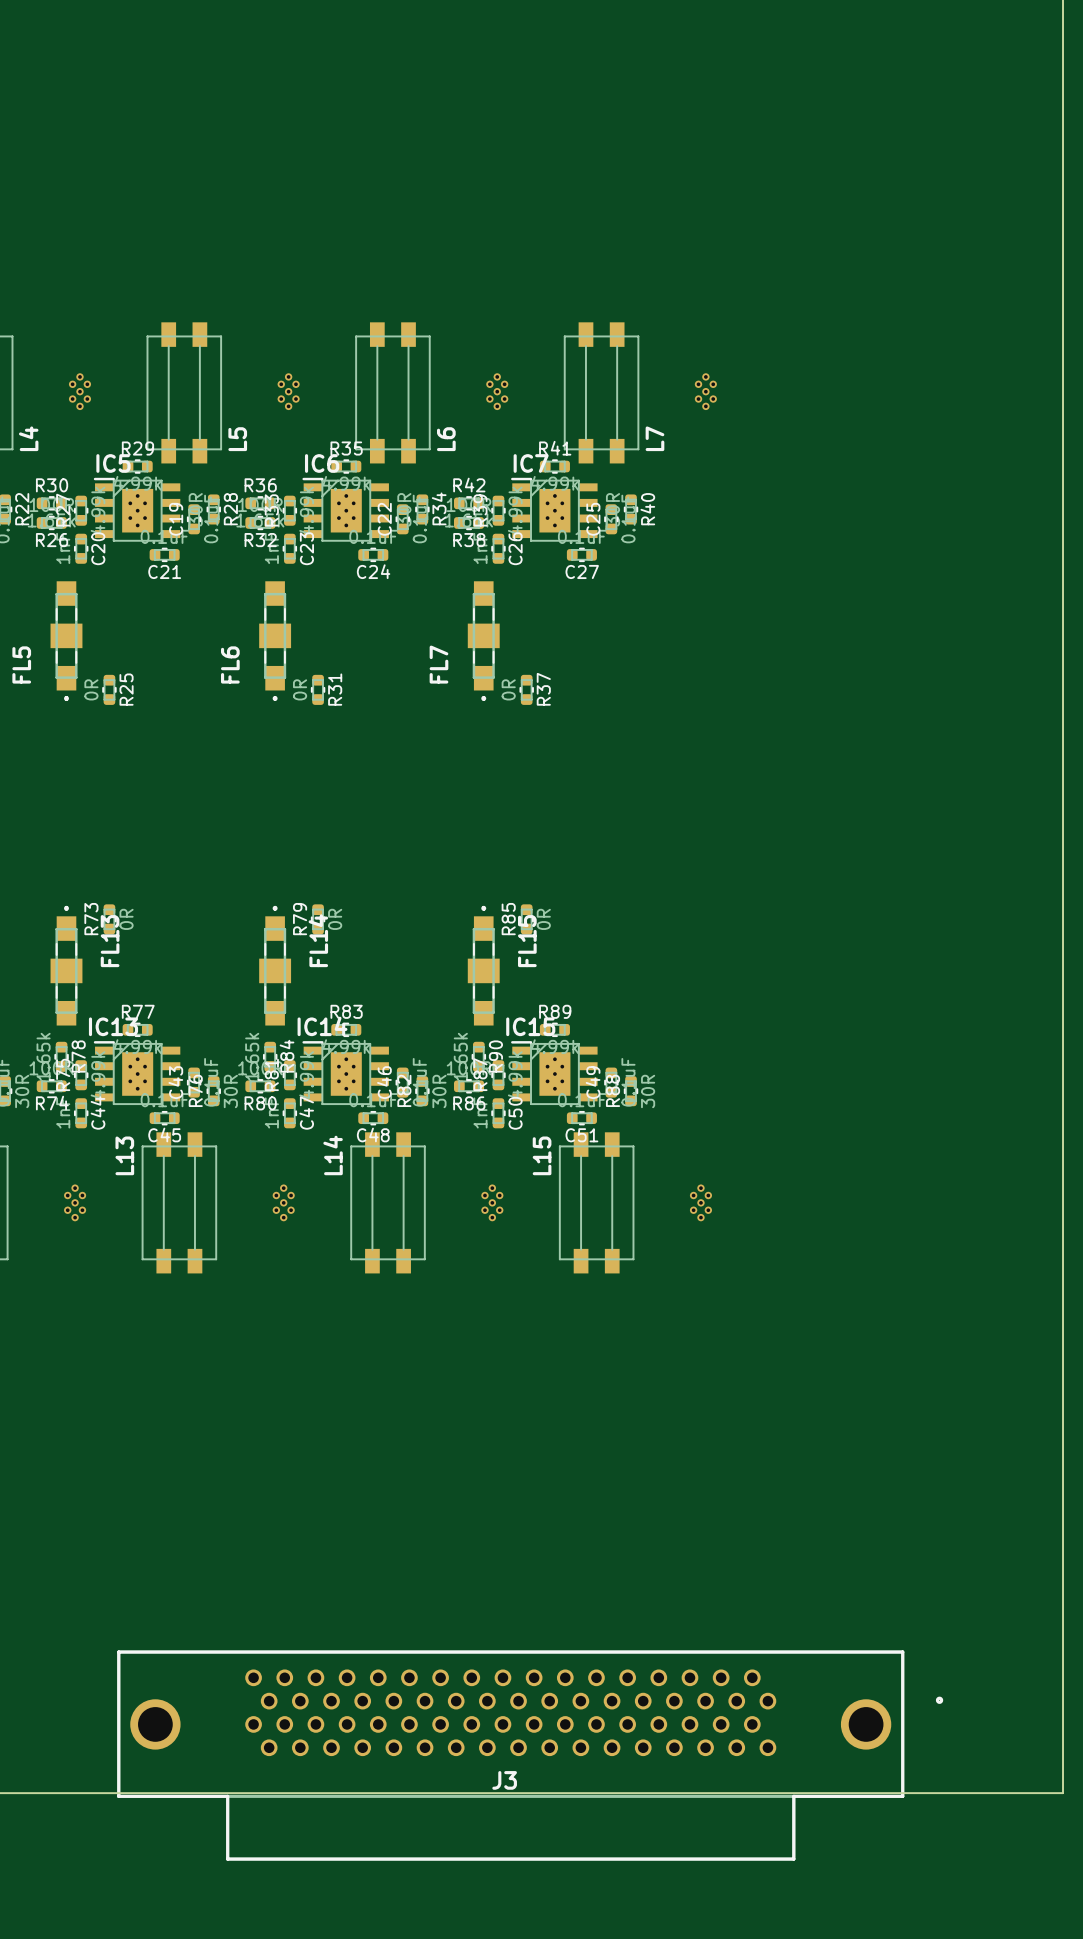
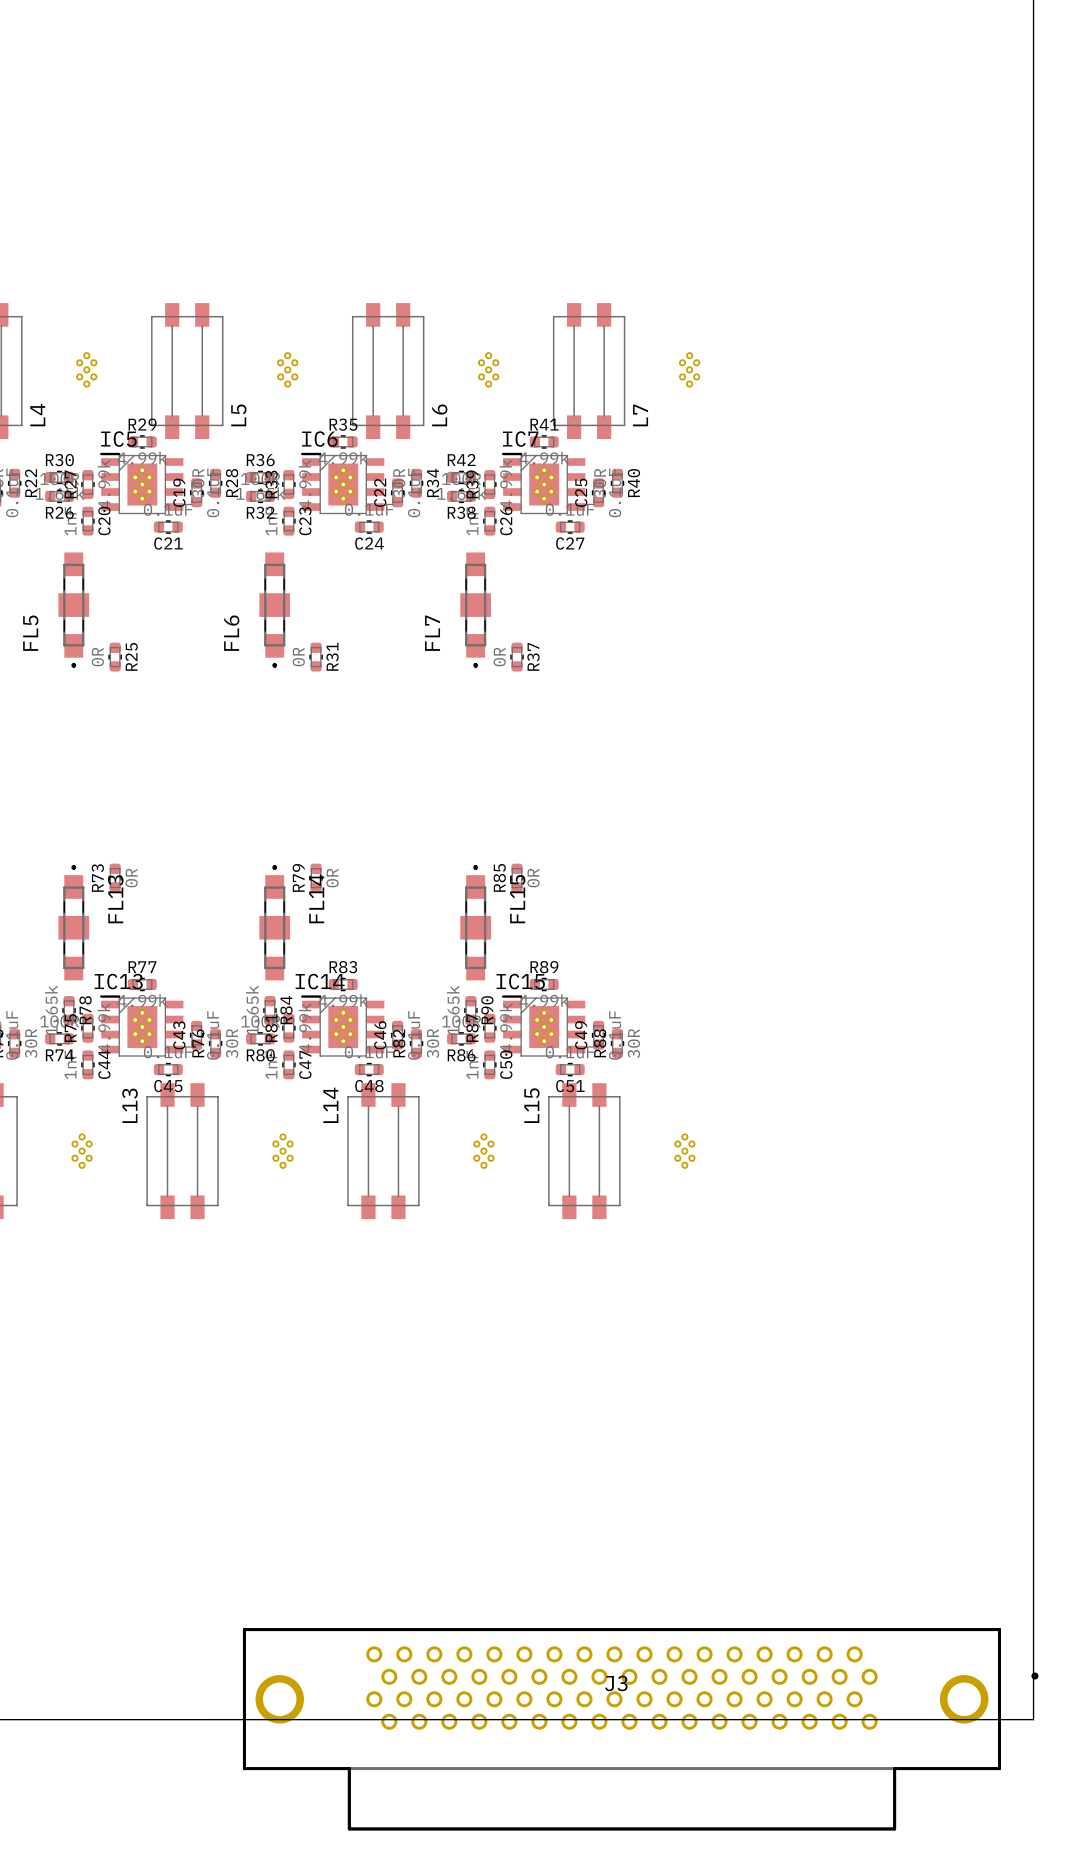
J3 position: (530, 1755) -> (640, 1729)
J3 name position: J3 (504, 1780) -> J3 (616, 1683)

